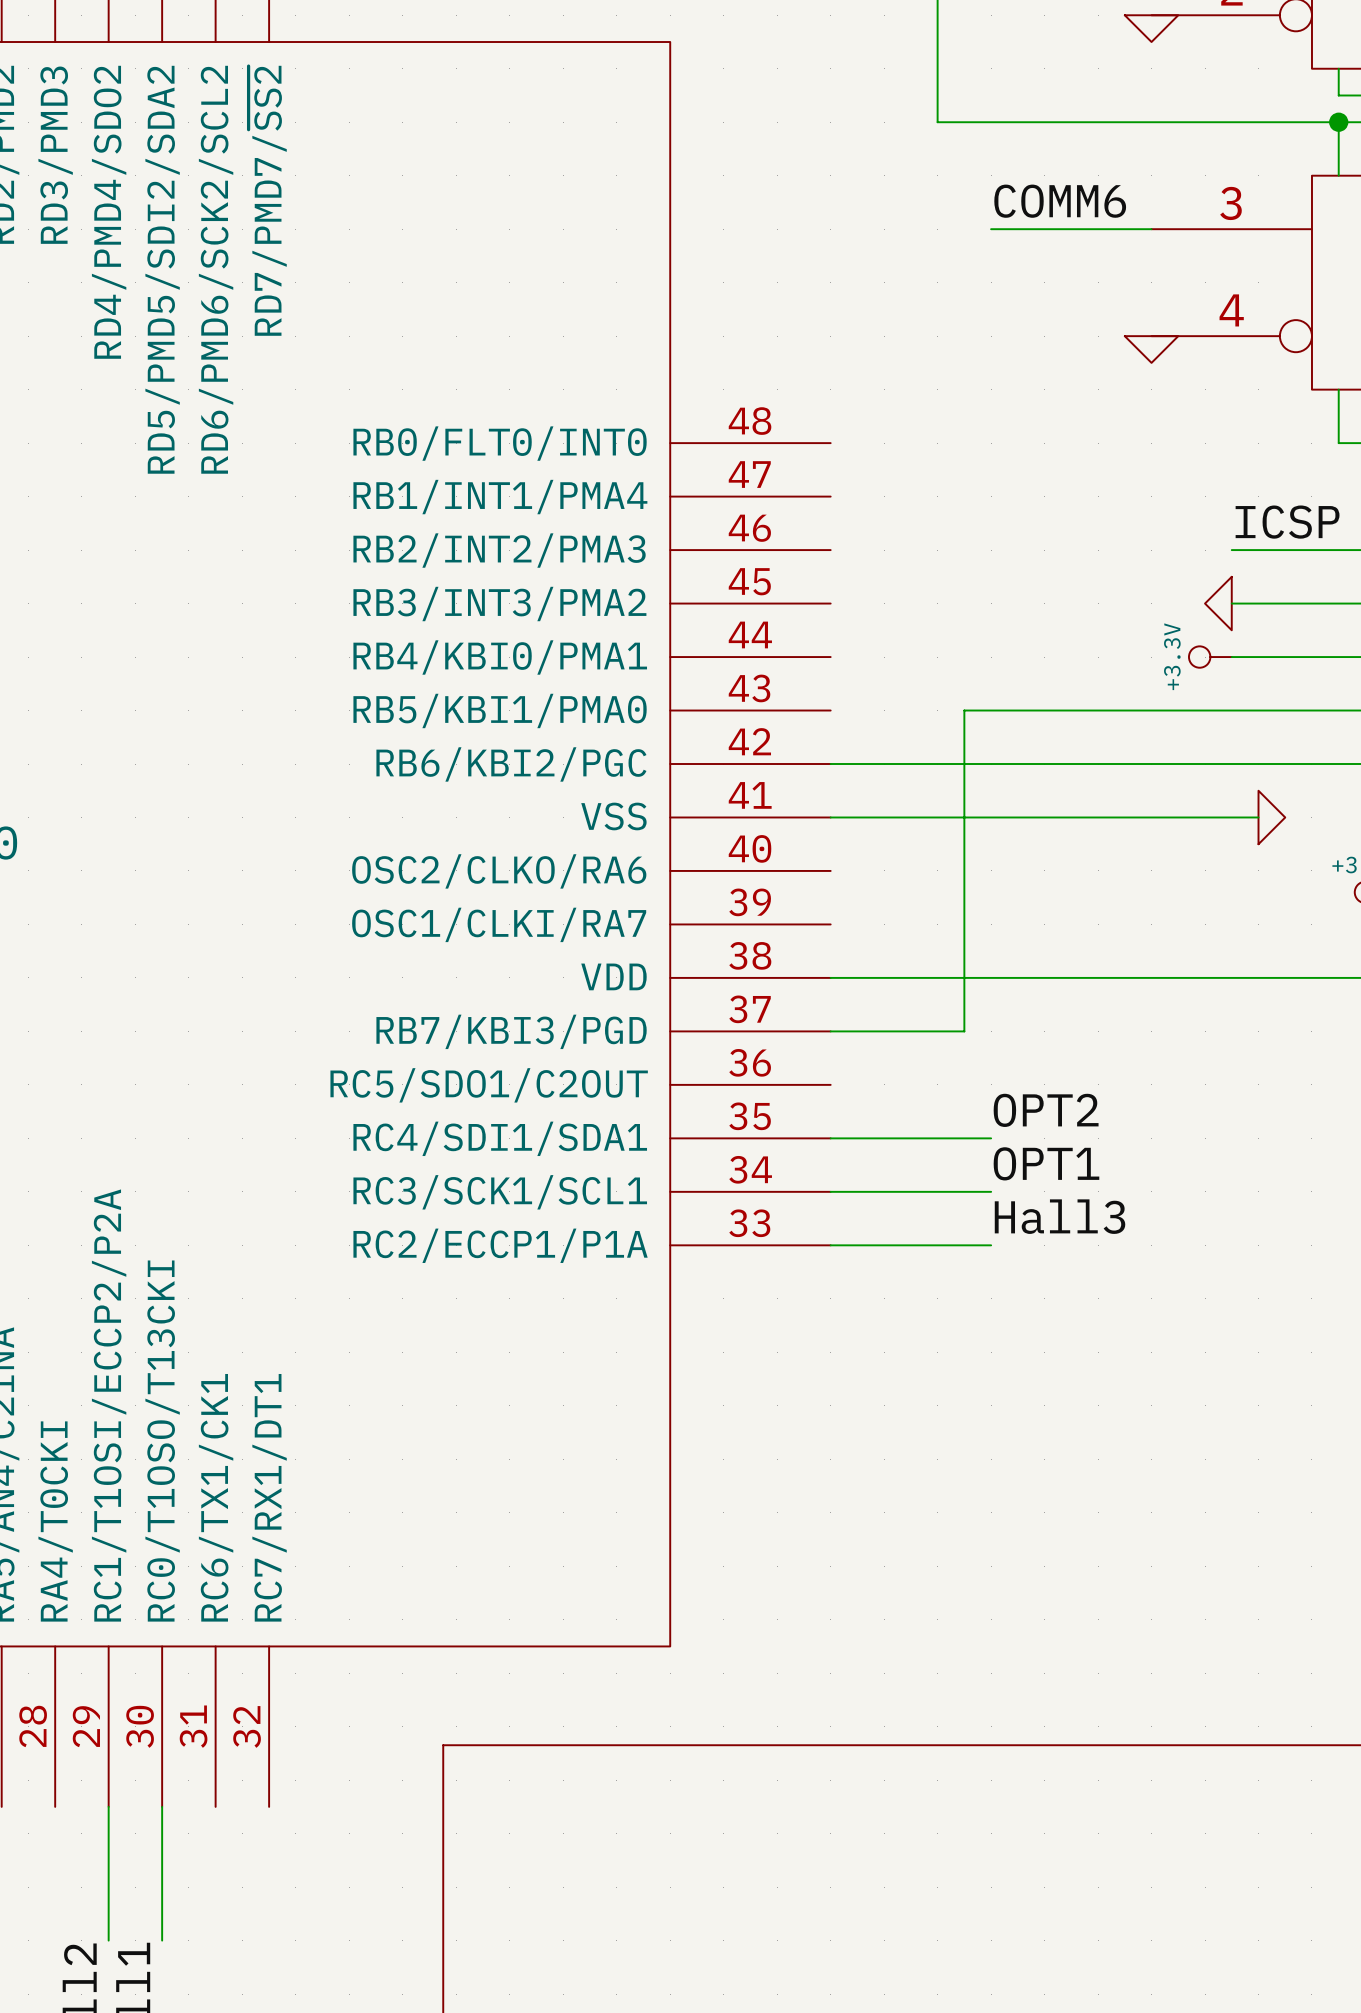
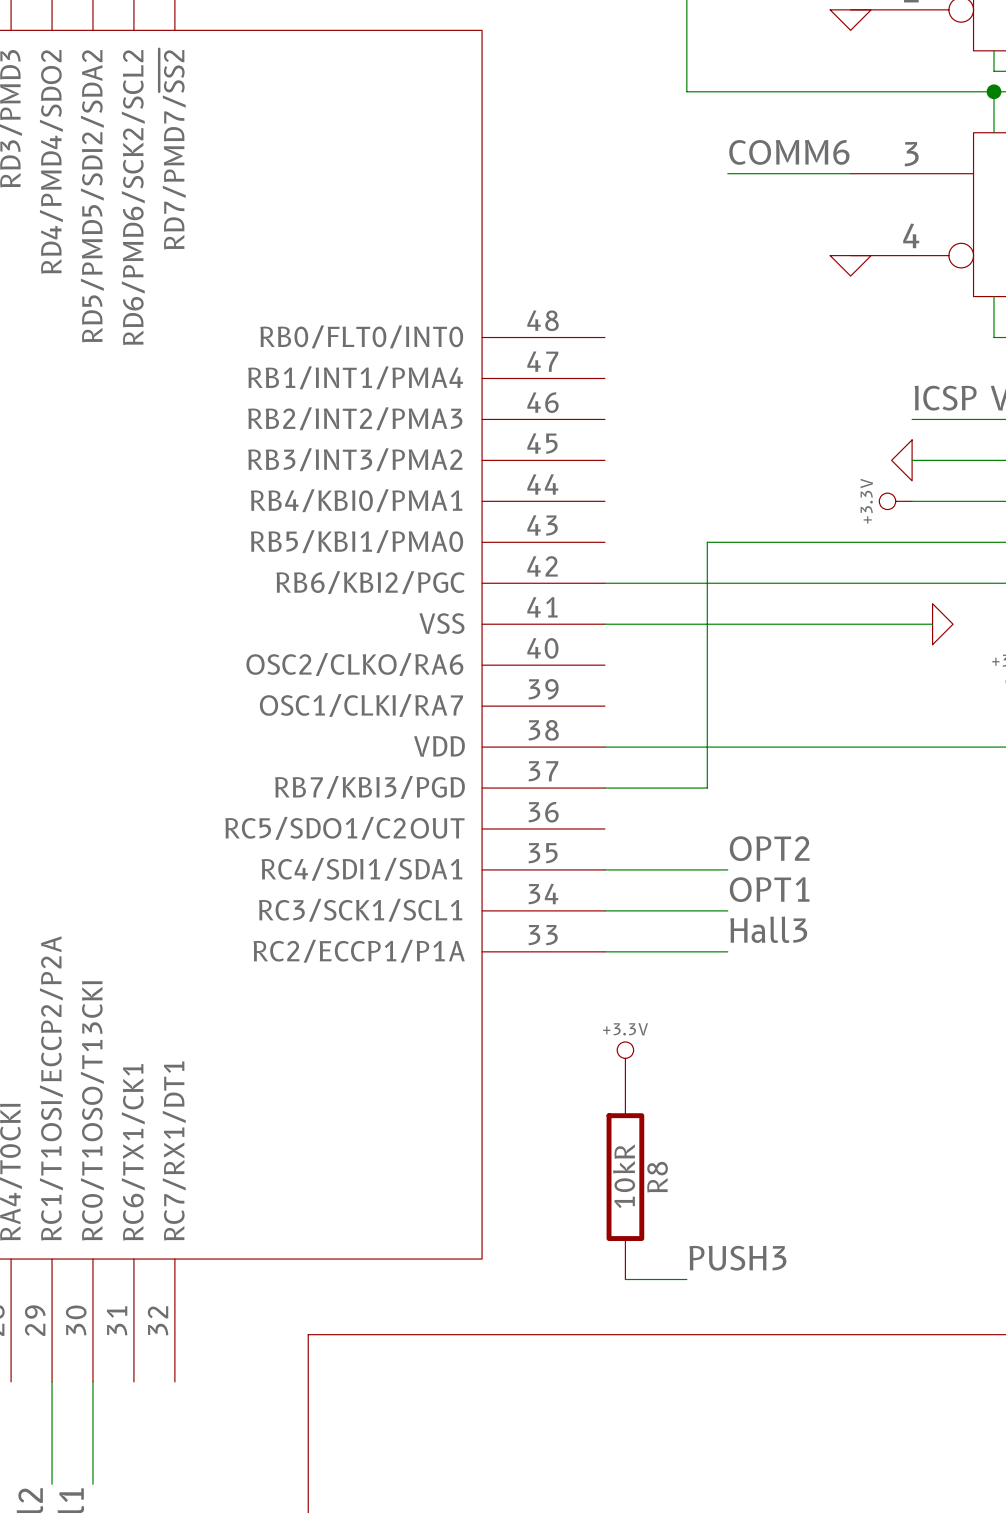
power symbol: none -> +3.3V (625, 1058)
R8: none -> 10kR (625, 1177)
label: none -> PUSH3 (737, 1258)
wire: none -> (625, 1279) (686, 1279)

